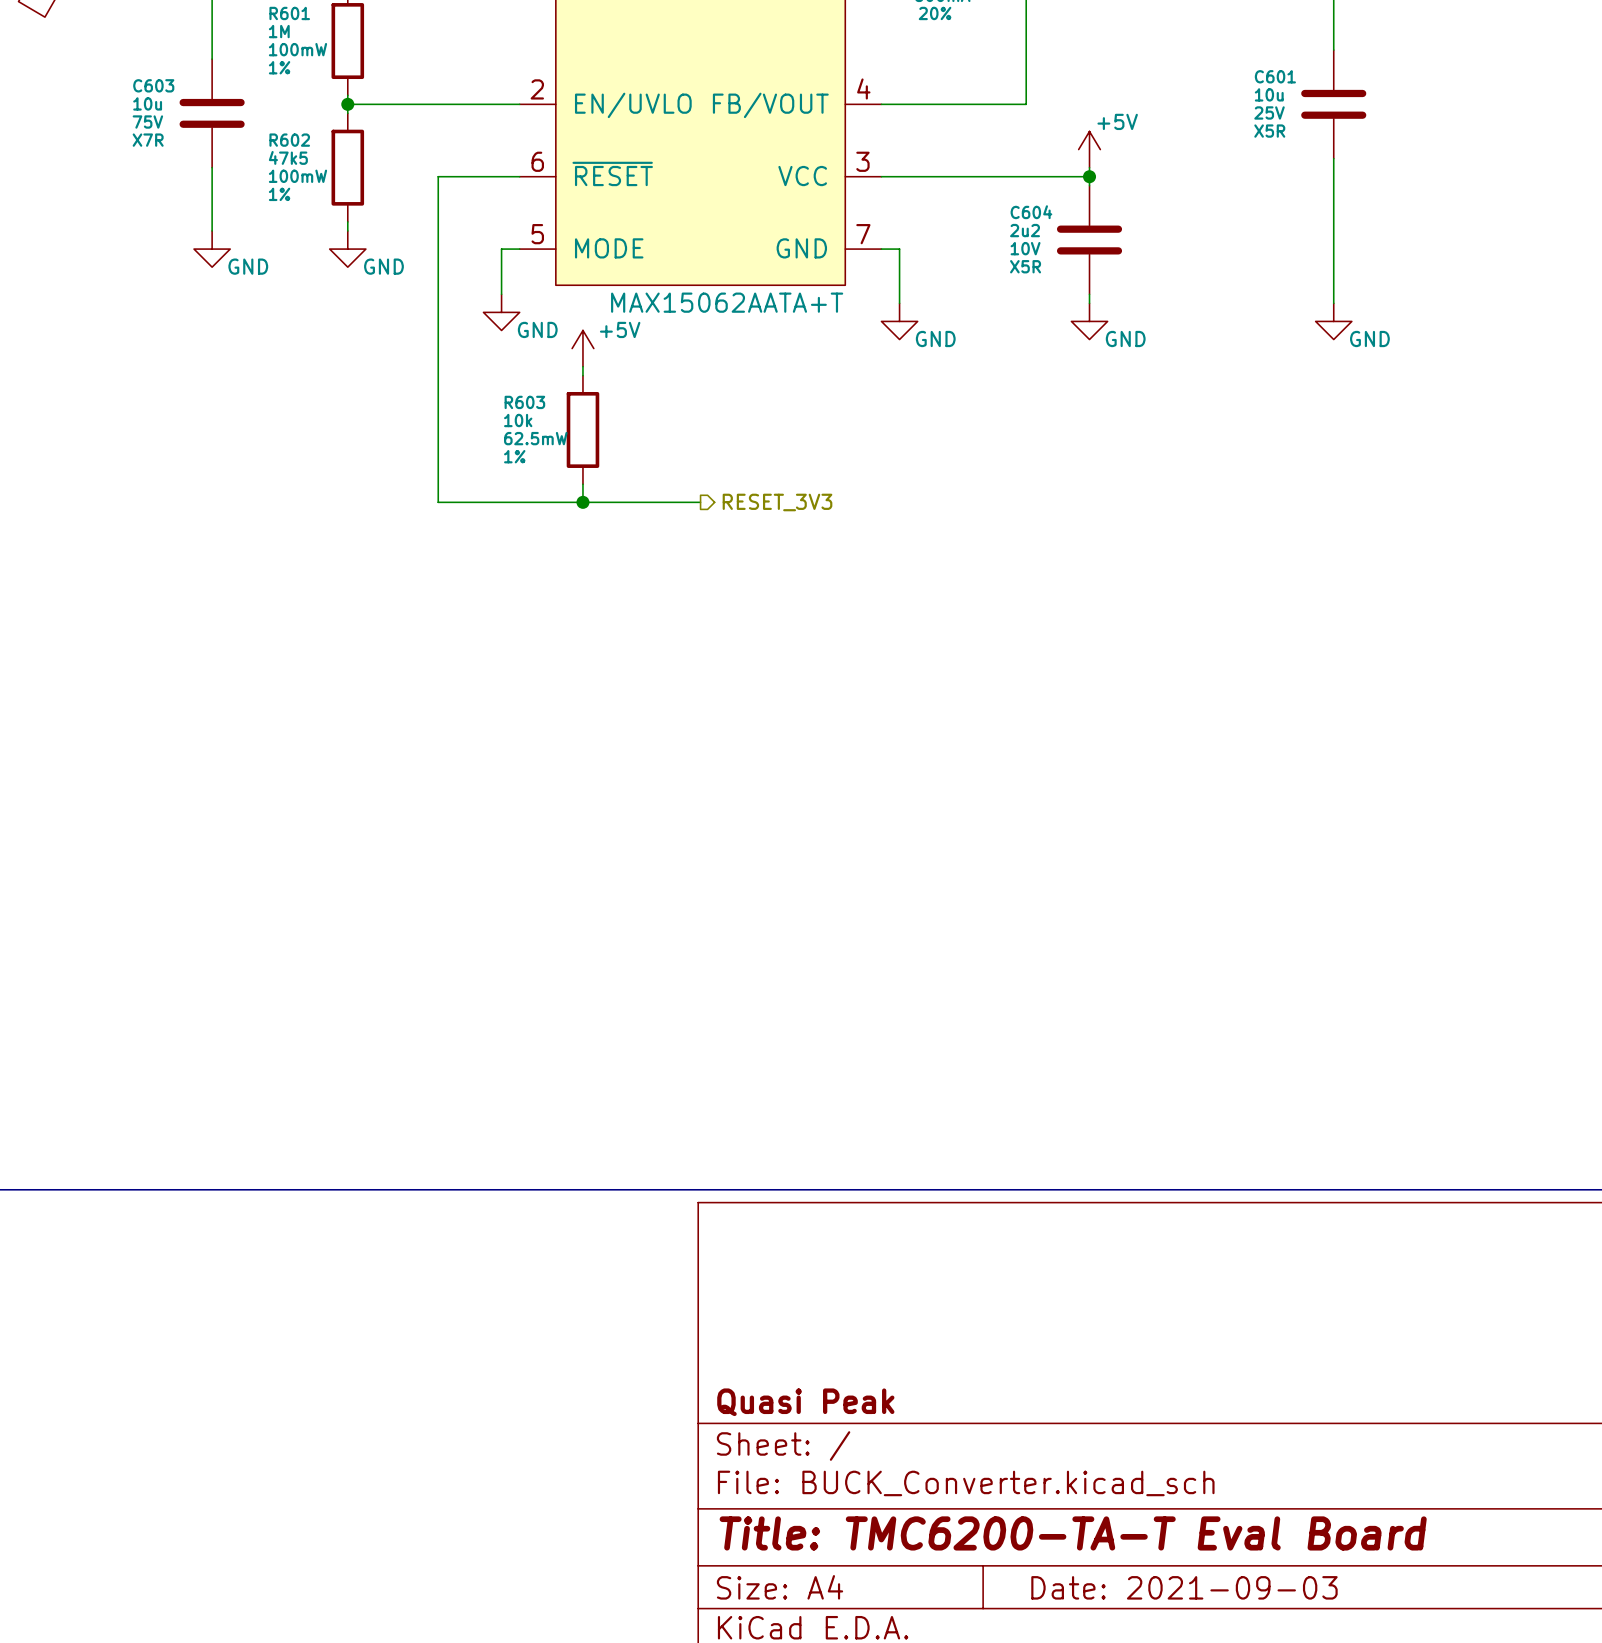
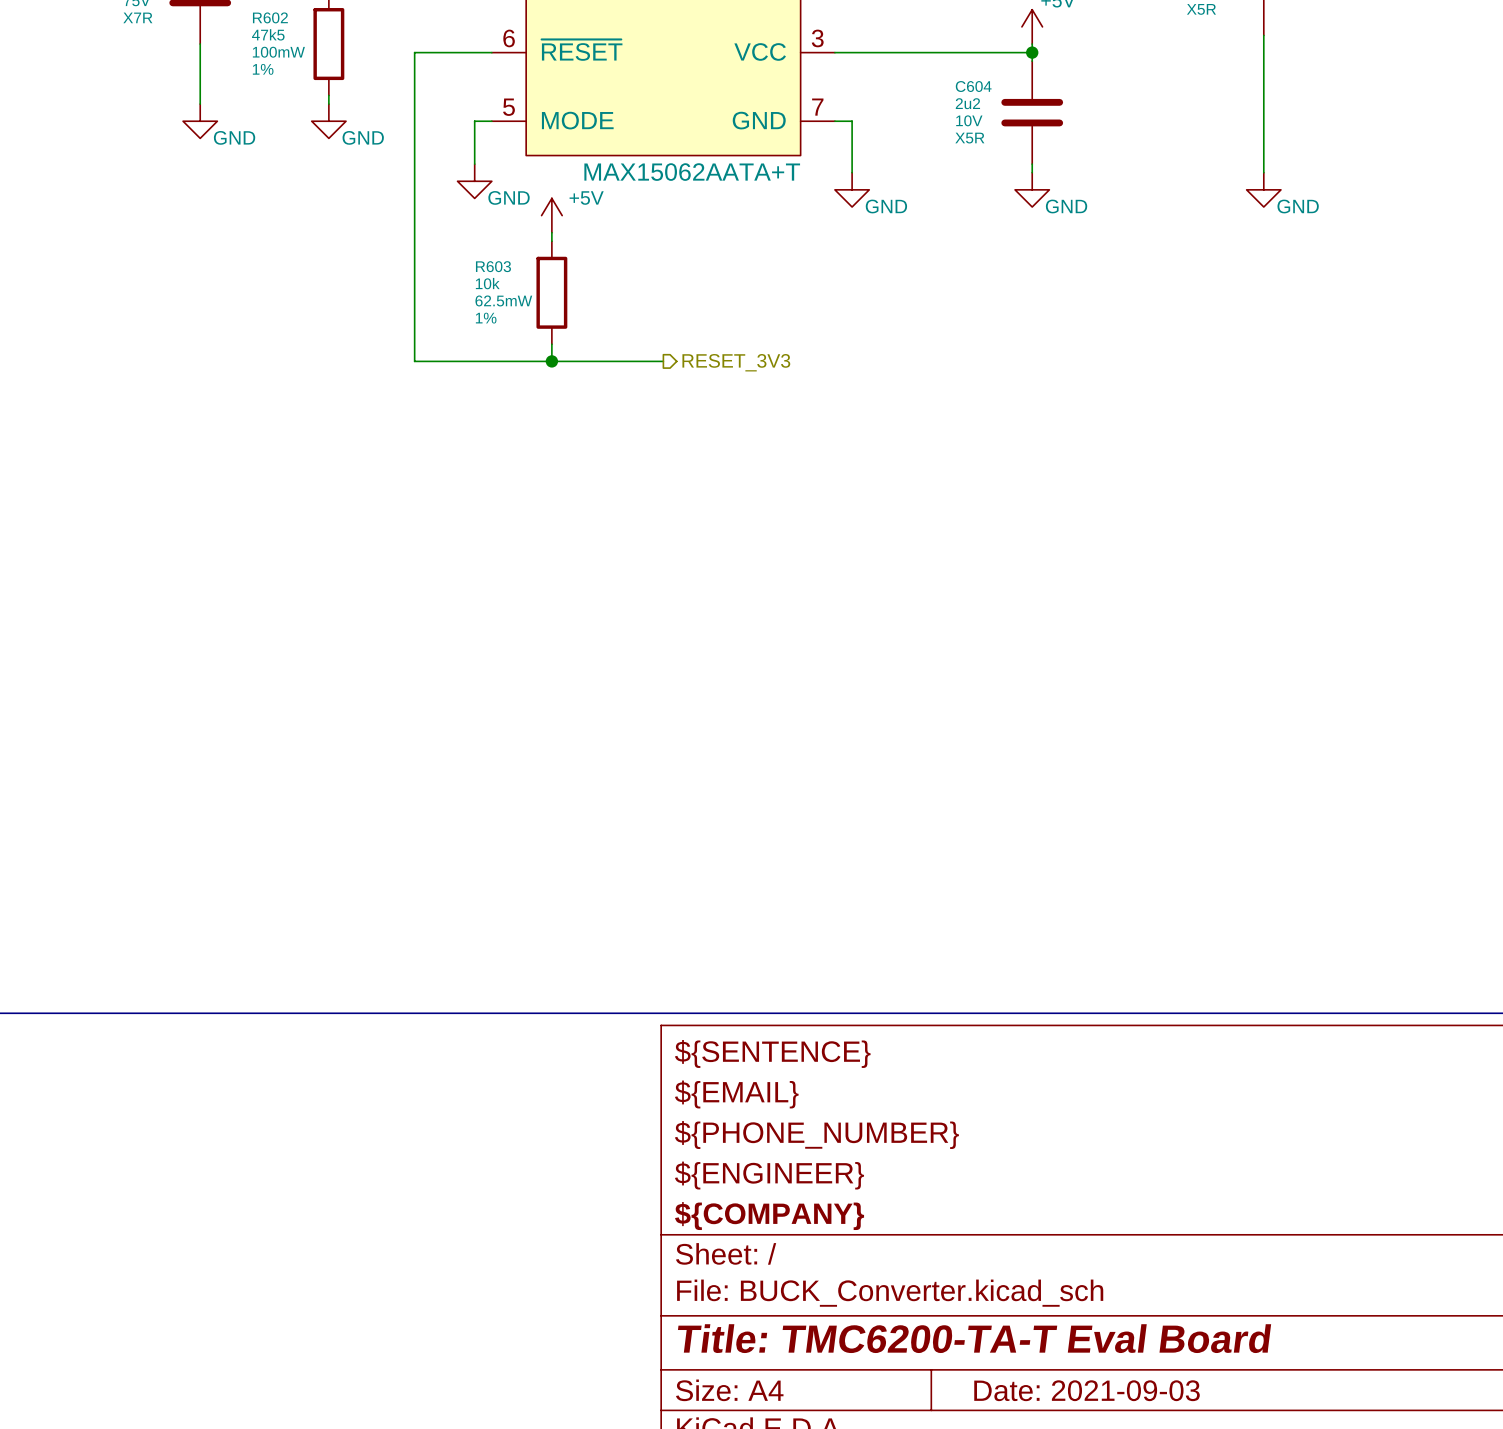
title block: none -> ${SENTENCE} (772, 1053)
title block: none -> ${EMAIL} (736, 1094)
title block: none -> ${PHONE_NUMBER} (816, 1135)
title block: none -> ${ENGINEER} (769, 1175)
title block: Quasi Peak (805, 1402) -> ${COMPANY} (769, 1216)

